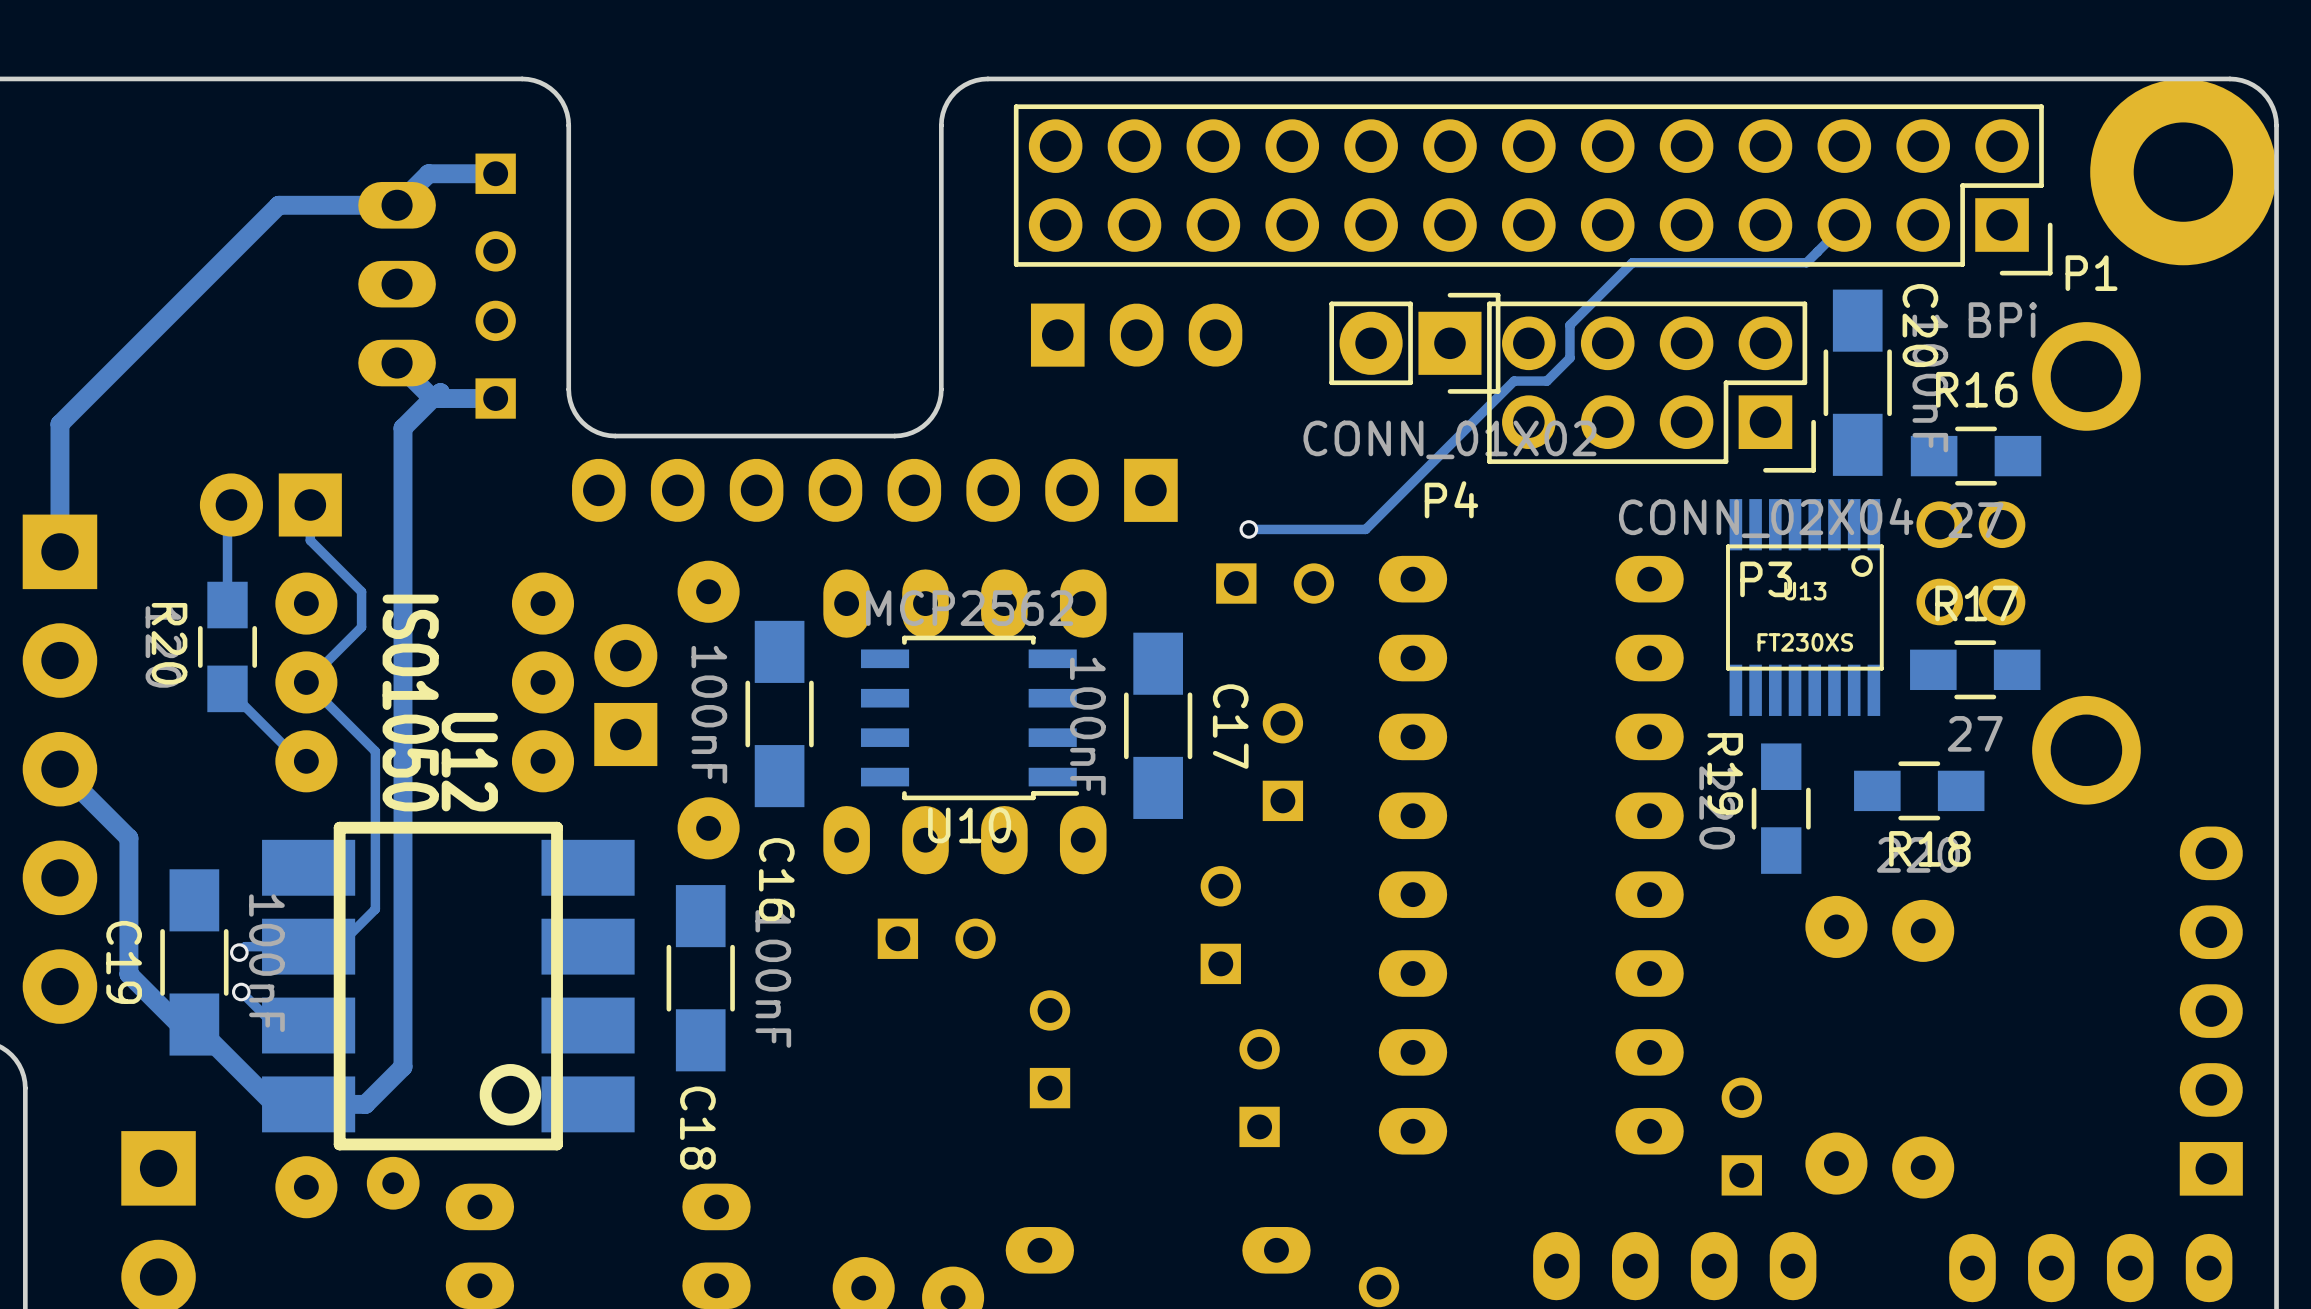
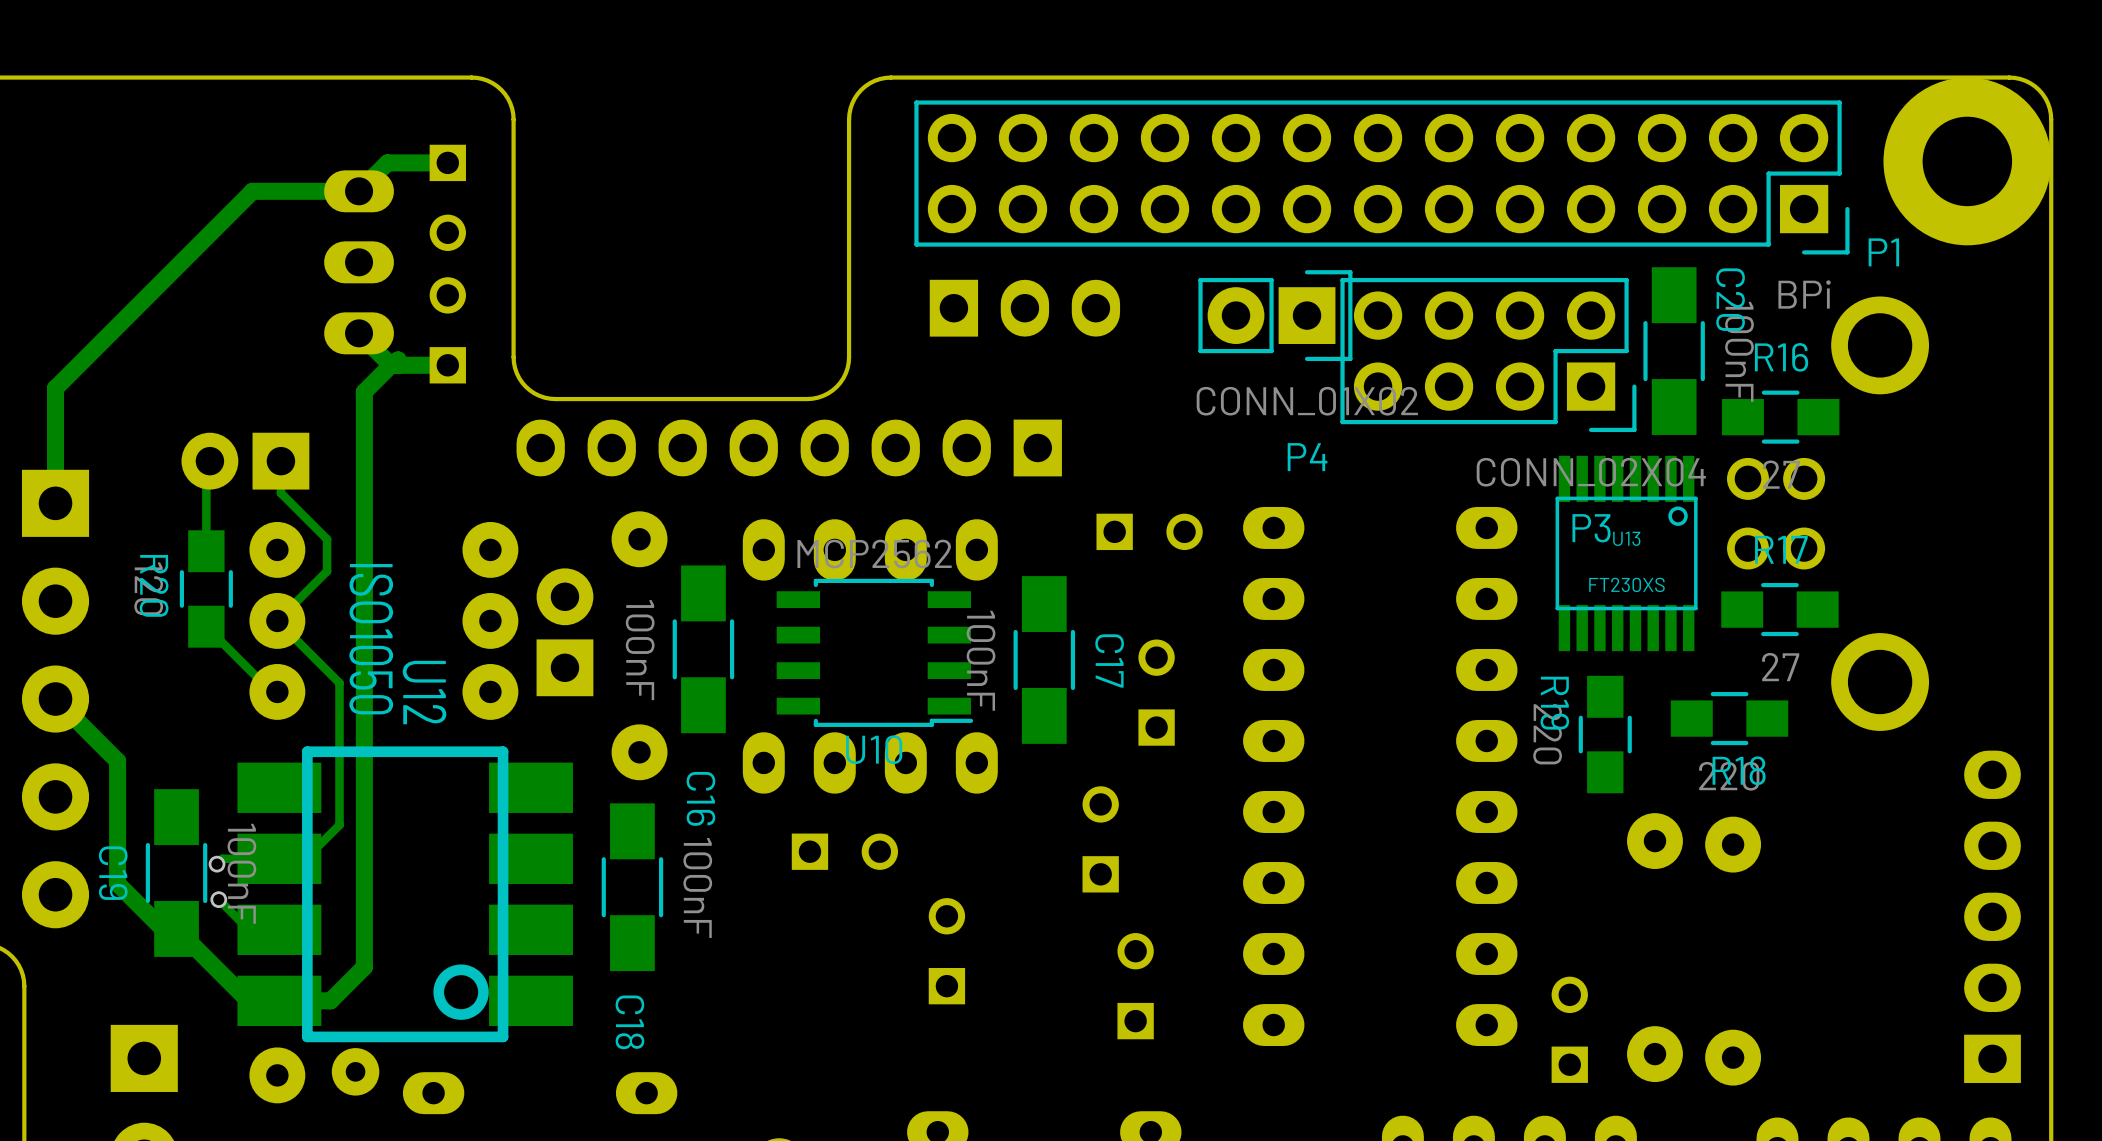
track: (1844, 225) (1806, 262) (1632, 262) (1569, 325) (1569, 358) (1546, 381) (1514, 381) (1365, 529) (1248, 529) -> none
via: (1248, 529) -> none

